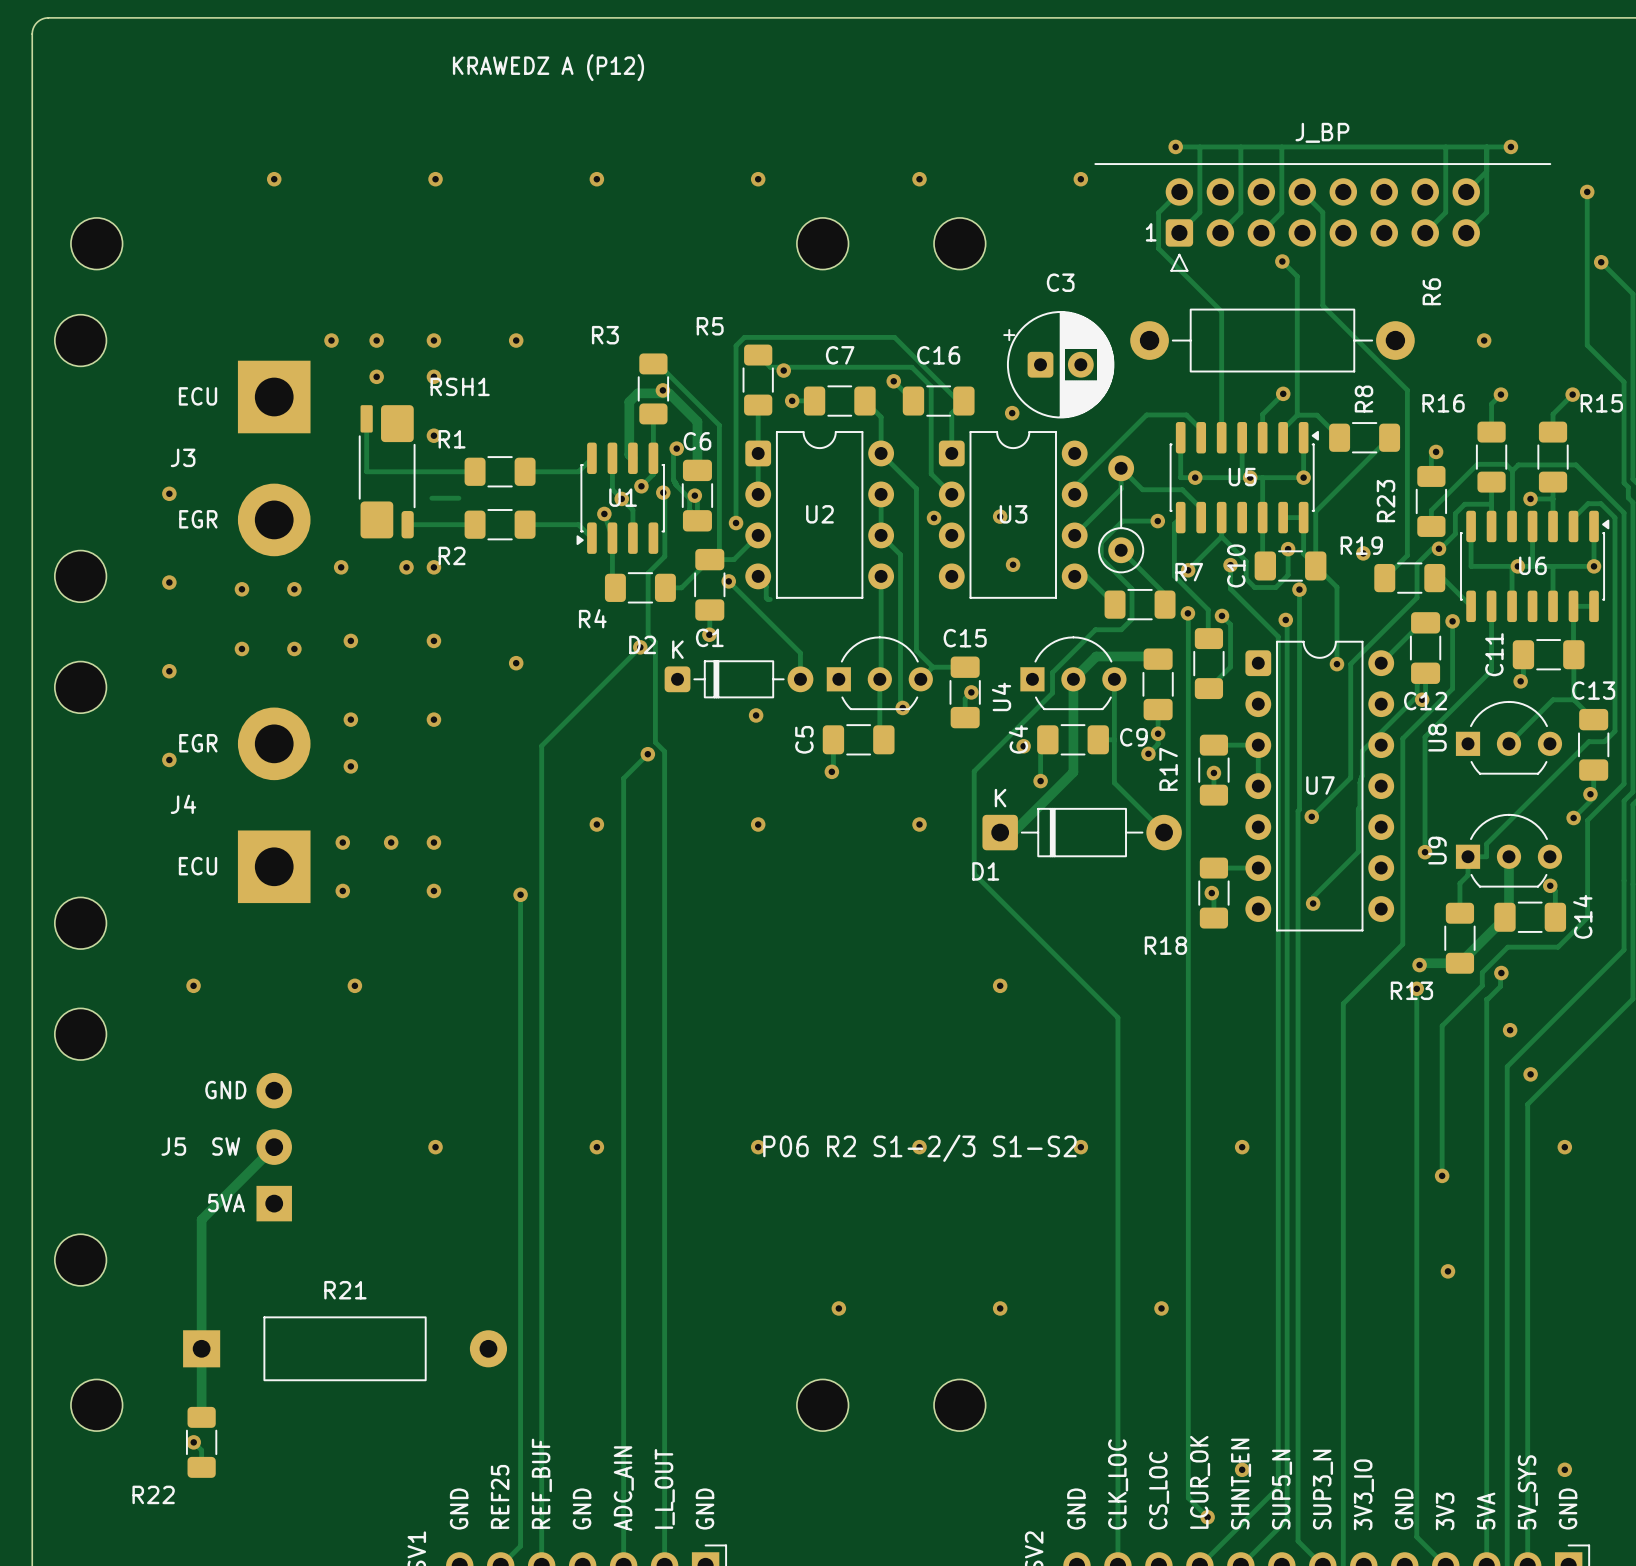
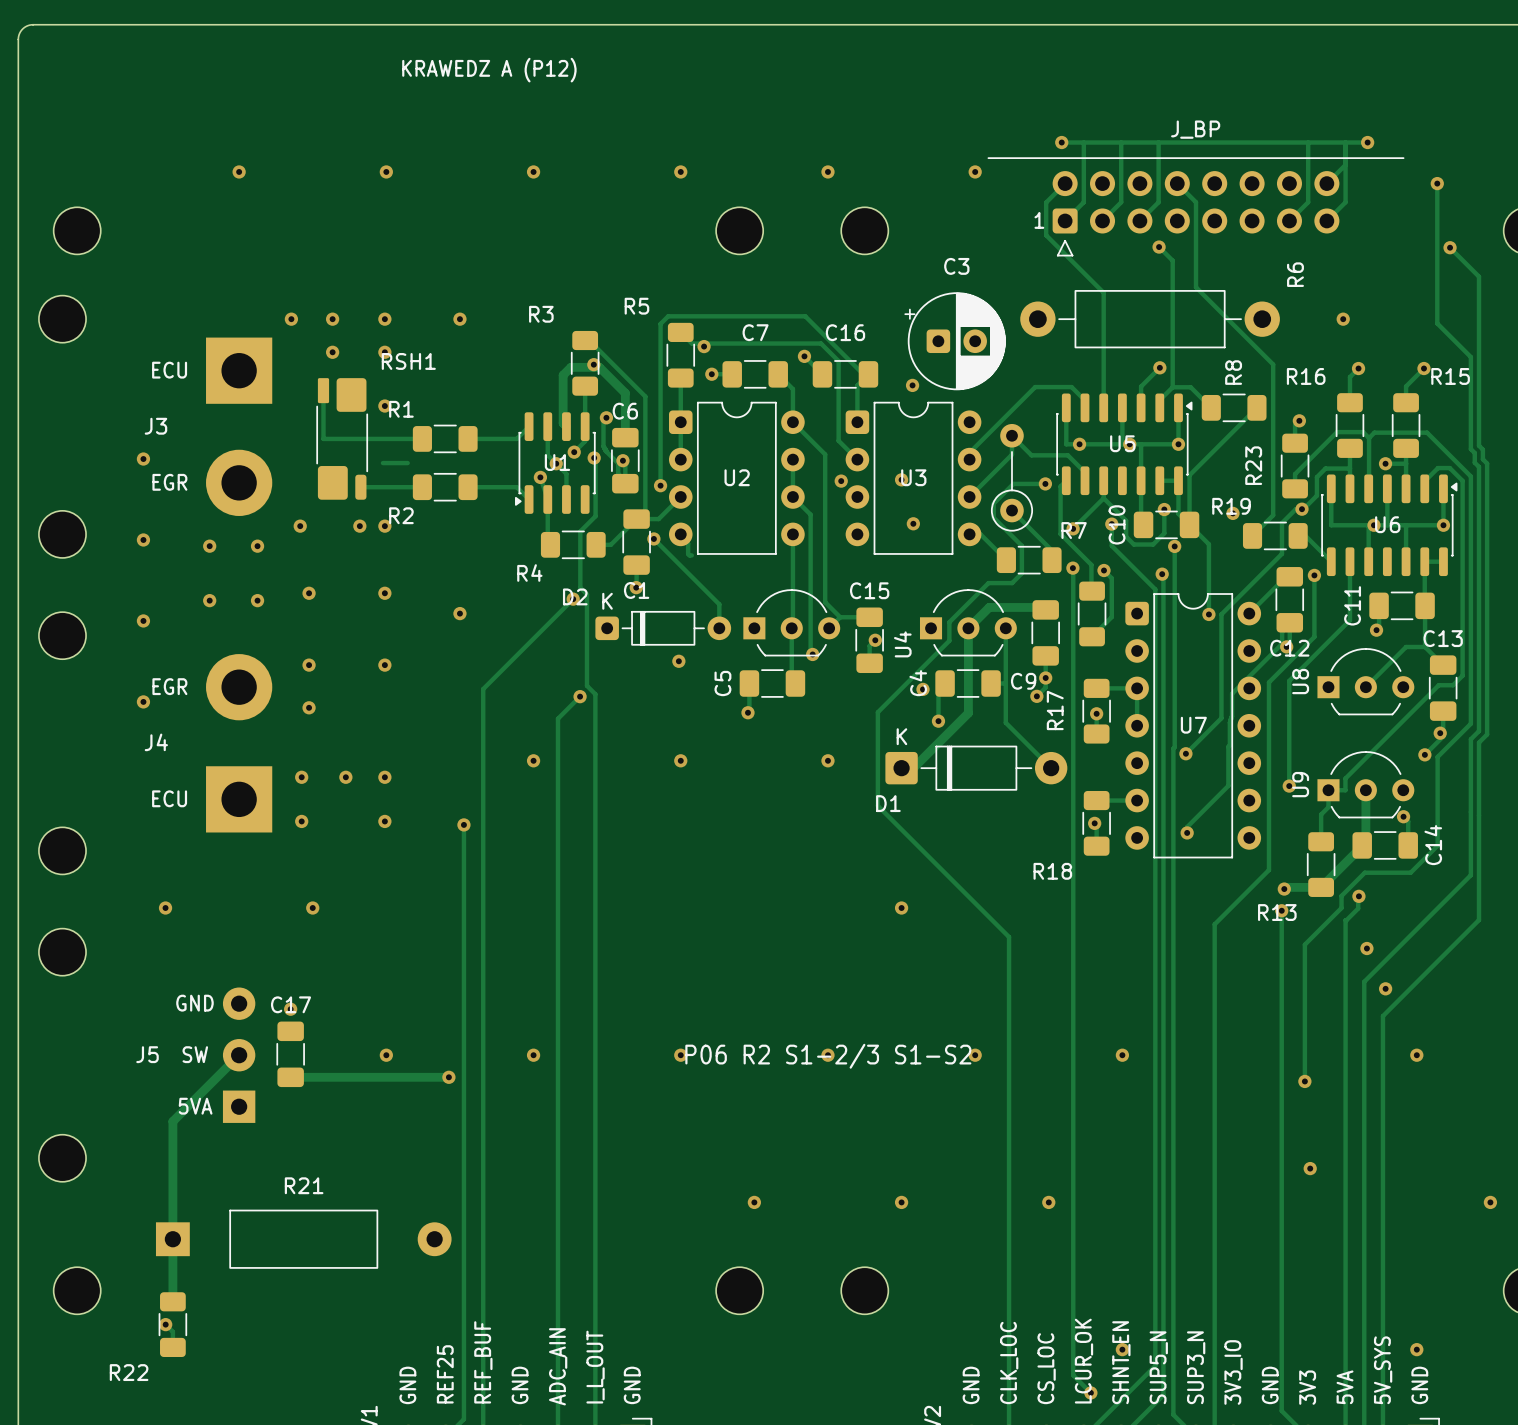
via: none -> (290, 1009)
C17: none -> (290, 1054)
track: none -> (290, 1077) (448, 1077)
via: none -> (448, 1077)

